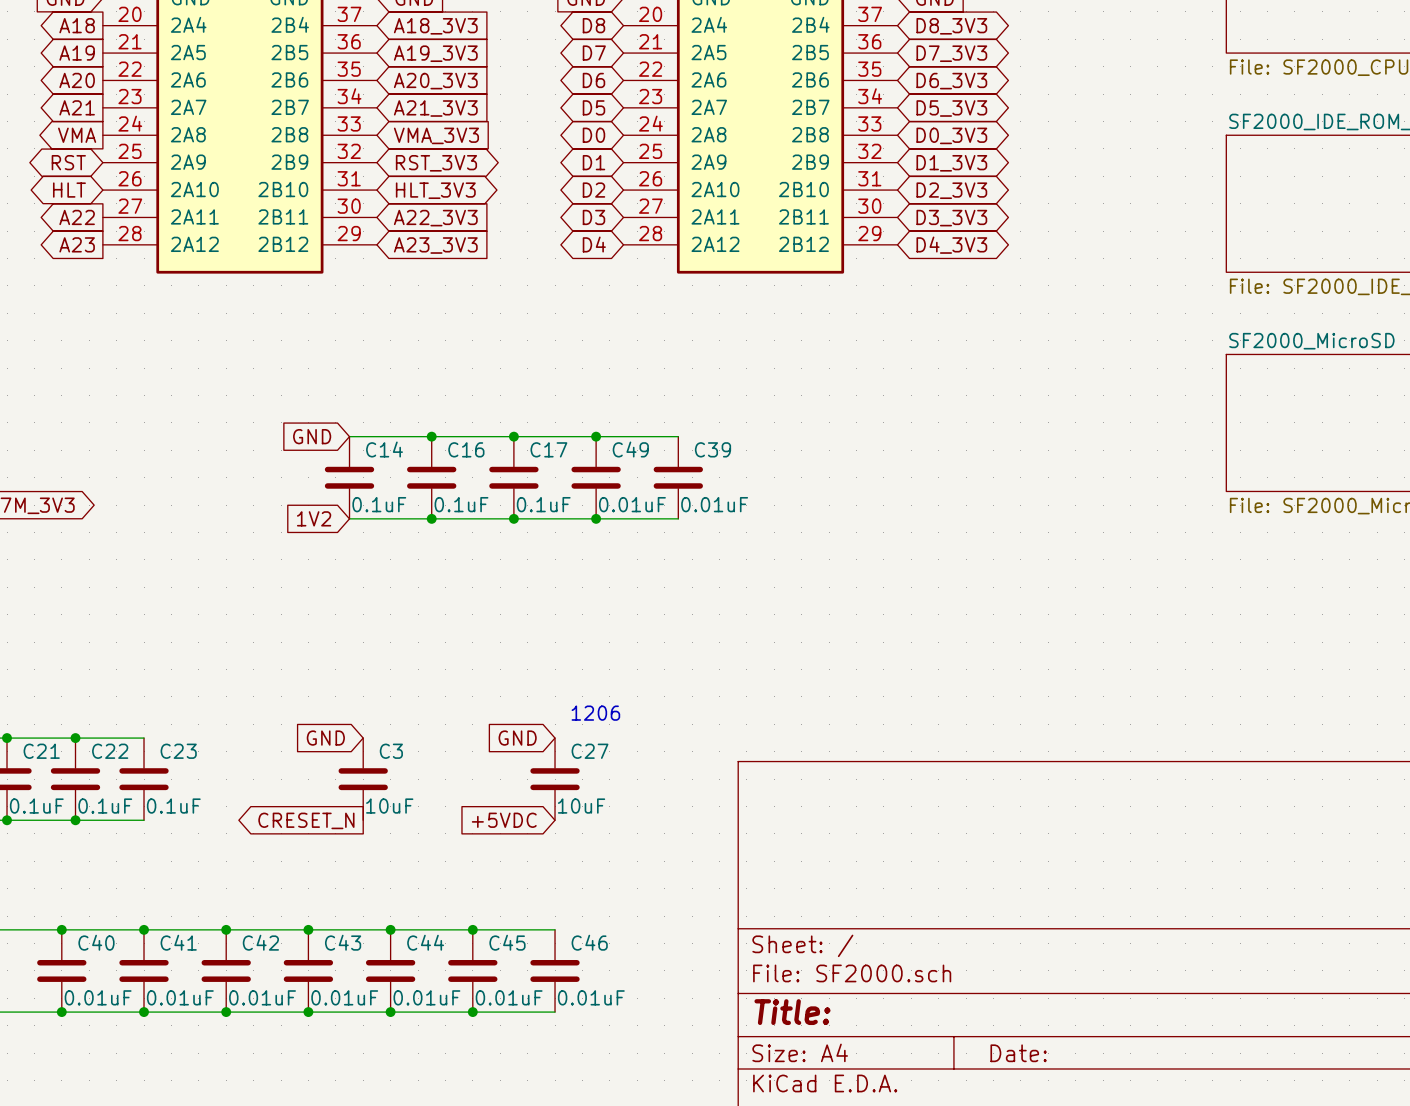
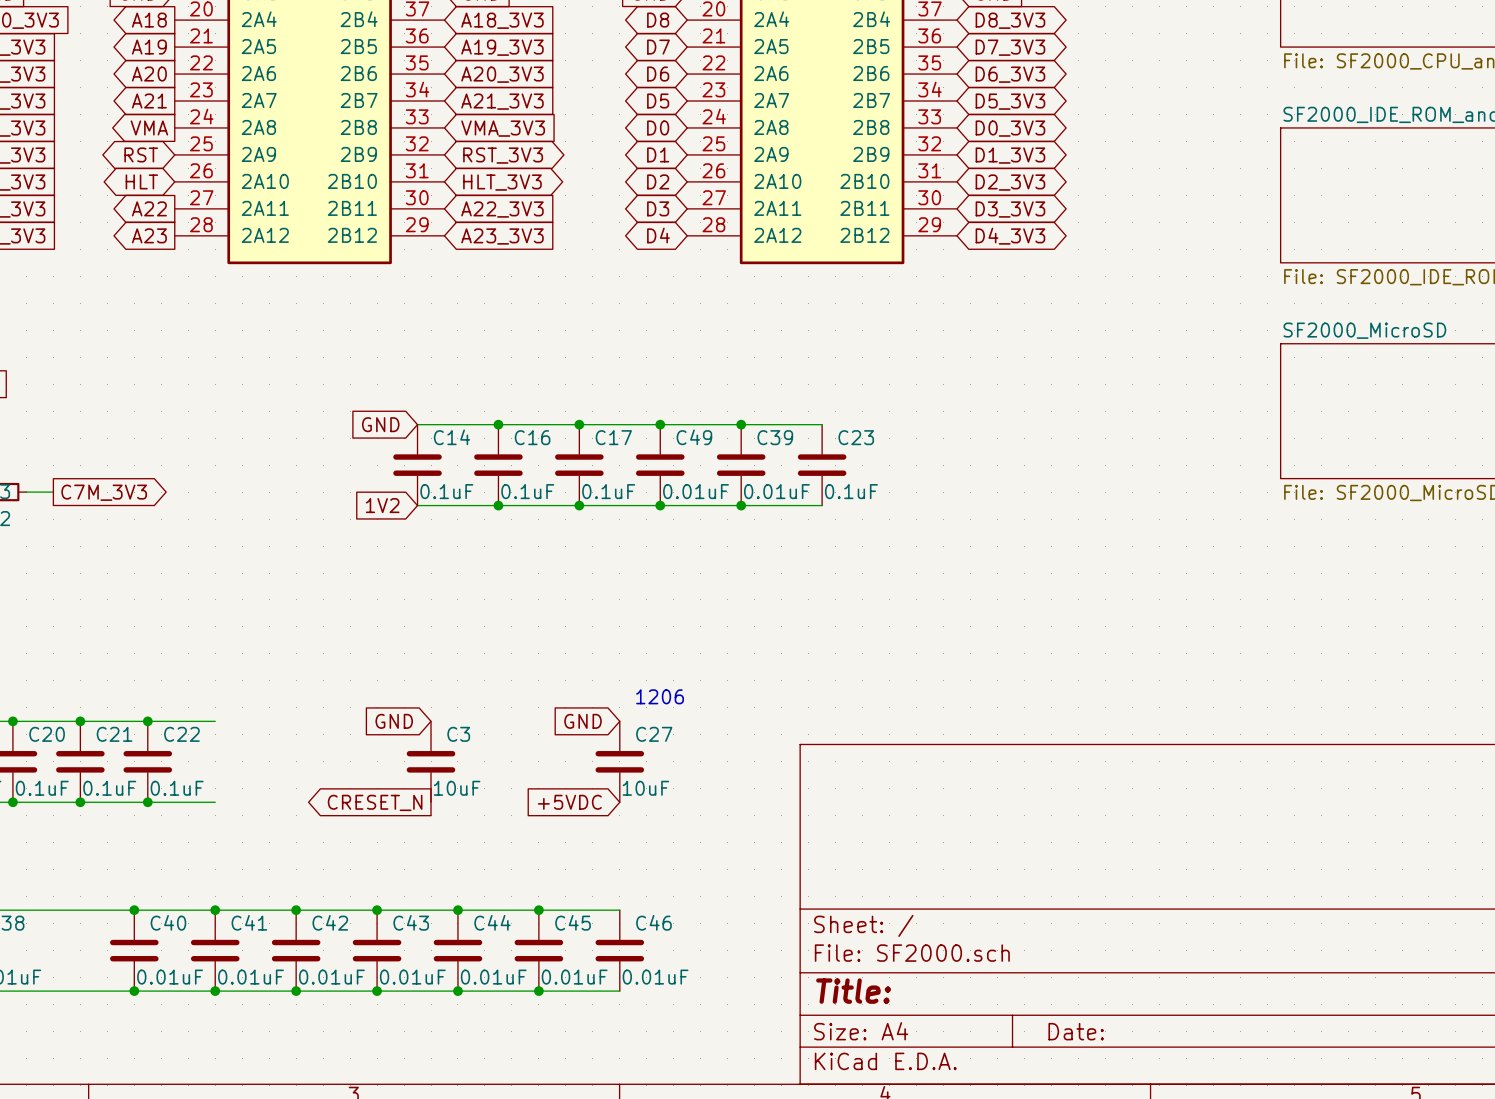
wire: none -> (741, 424) (822, 424)
junction: none -> (741, 424)
wire: none -> (741, 505) (822, 505)
junction: none -> (741, 505)
C23 position: (144, 779) -> (822, 465)

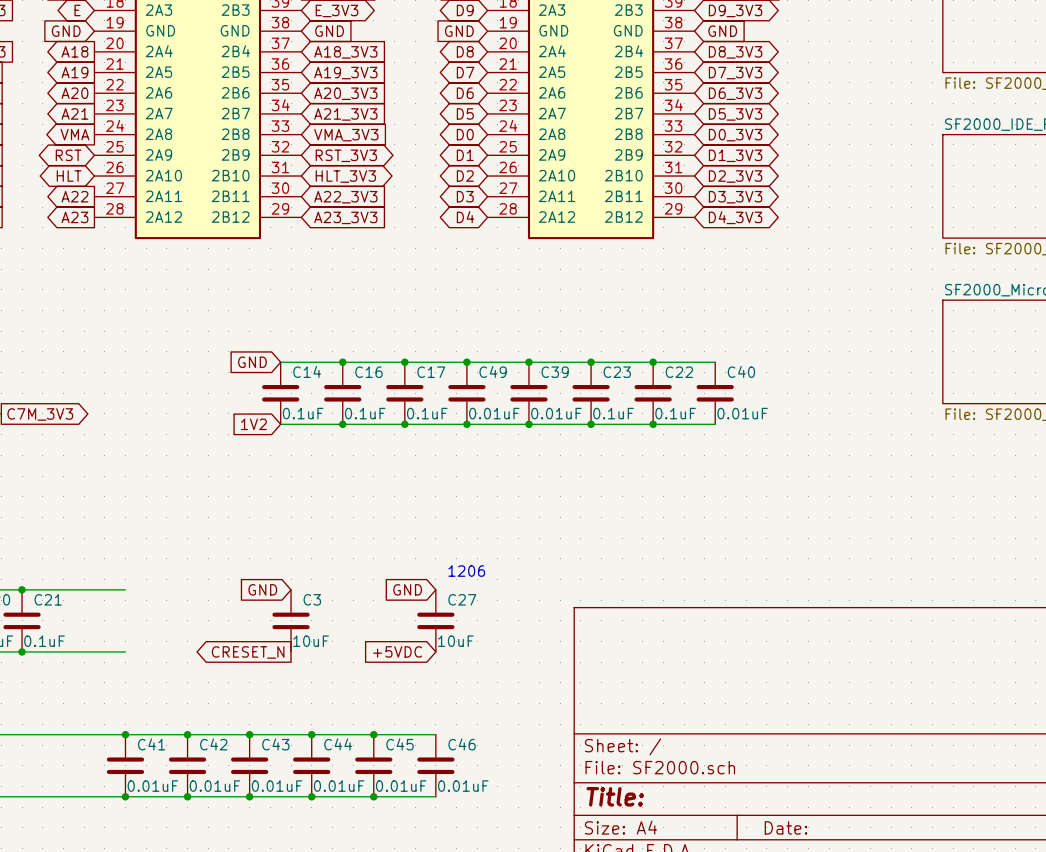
wire: none -> (591, 362) (715, 362)
junction: none -> (591, 362)
junction: none -> (653, 362)
wire: none -> (591, 424) (715, 424)
junction: none -> (591, 424)
junction: none -> (653, 424)
junction: (147, 721) -> none
C22 position: (147, 761) -> (653, 393)
junction: (147, 802) -> none
junction: (134, 910) -> none
C40 position: (134, 950) -> (715, 393)
junction: (134, 991) -> none

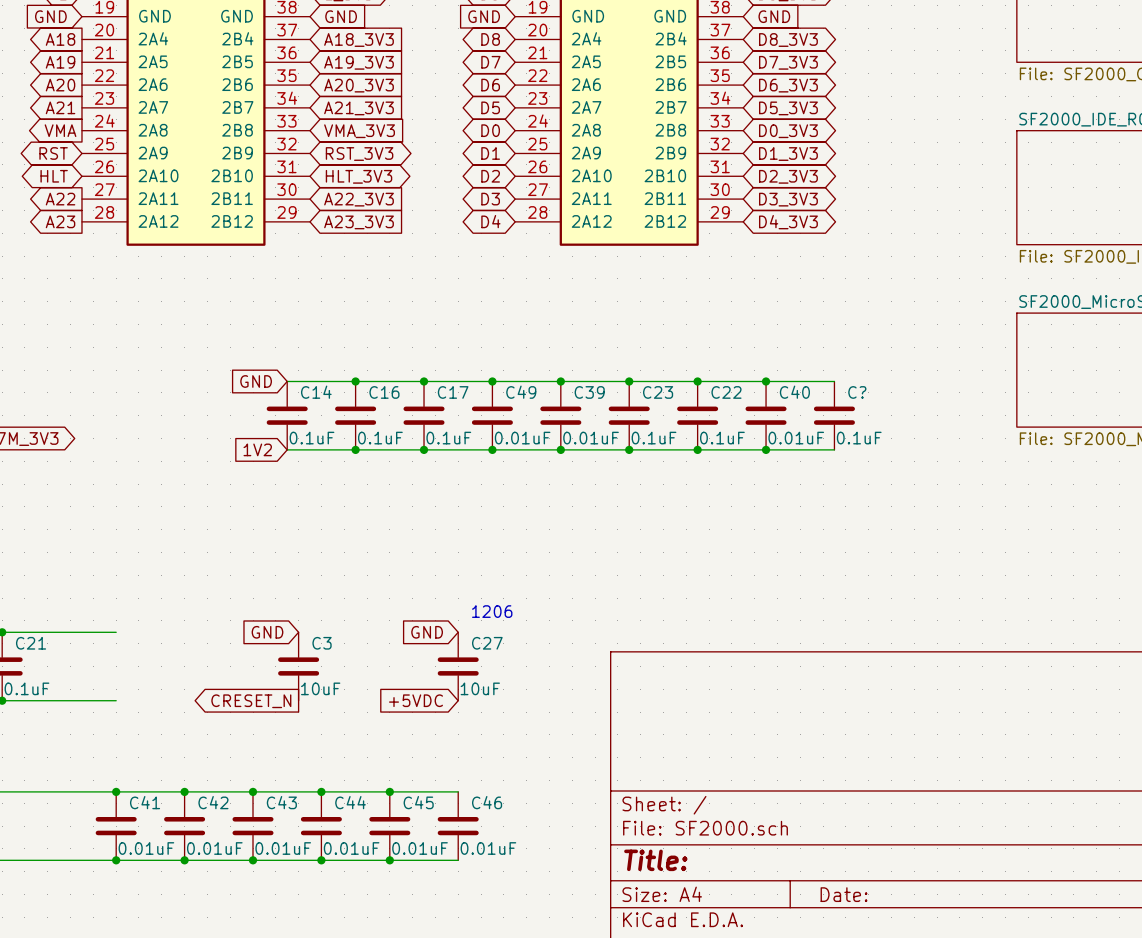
wire: none -> (766, 381) (834, 381)
junction: none -> (766, 381)
C?: none -> 0.1uF (834, 415)
wire: none -> (766, 449) (834, 449)
junction: none -> (766, 449)

